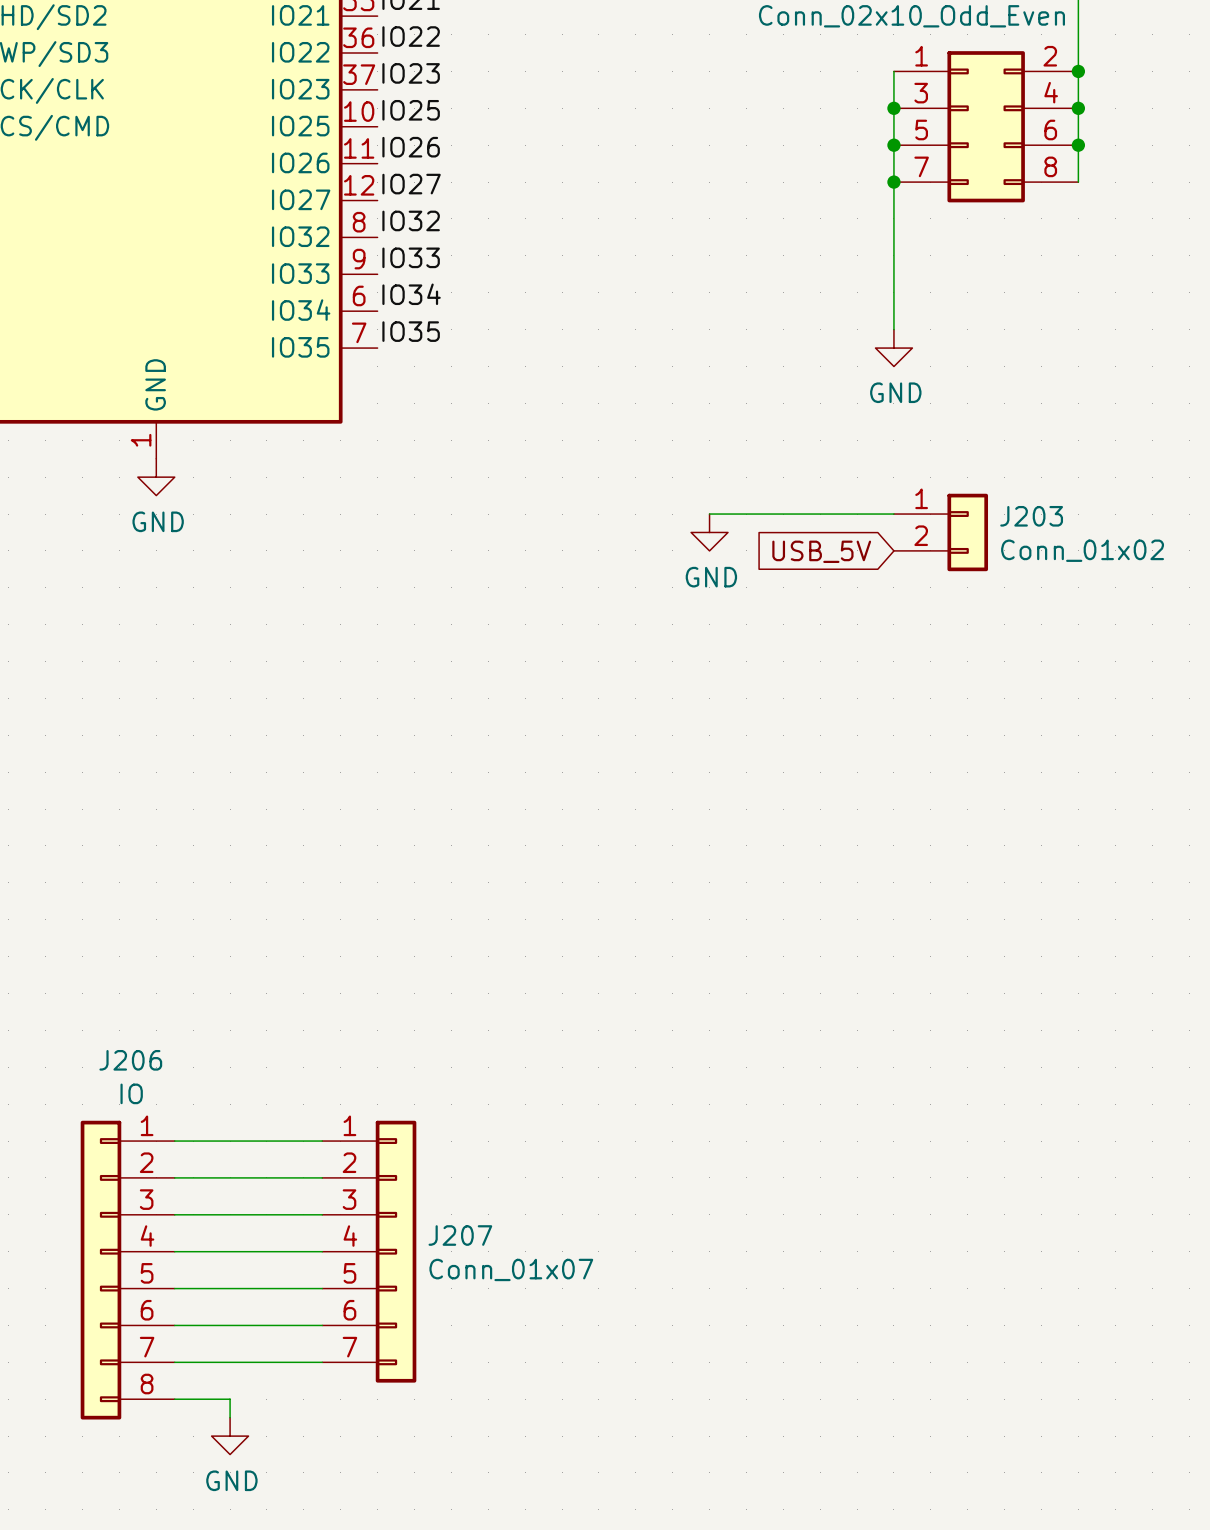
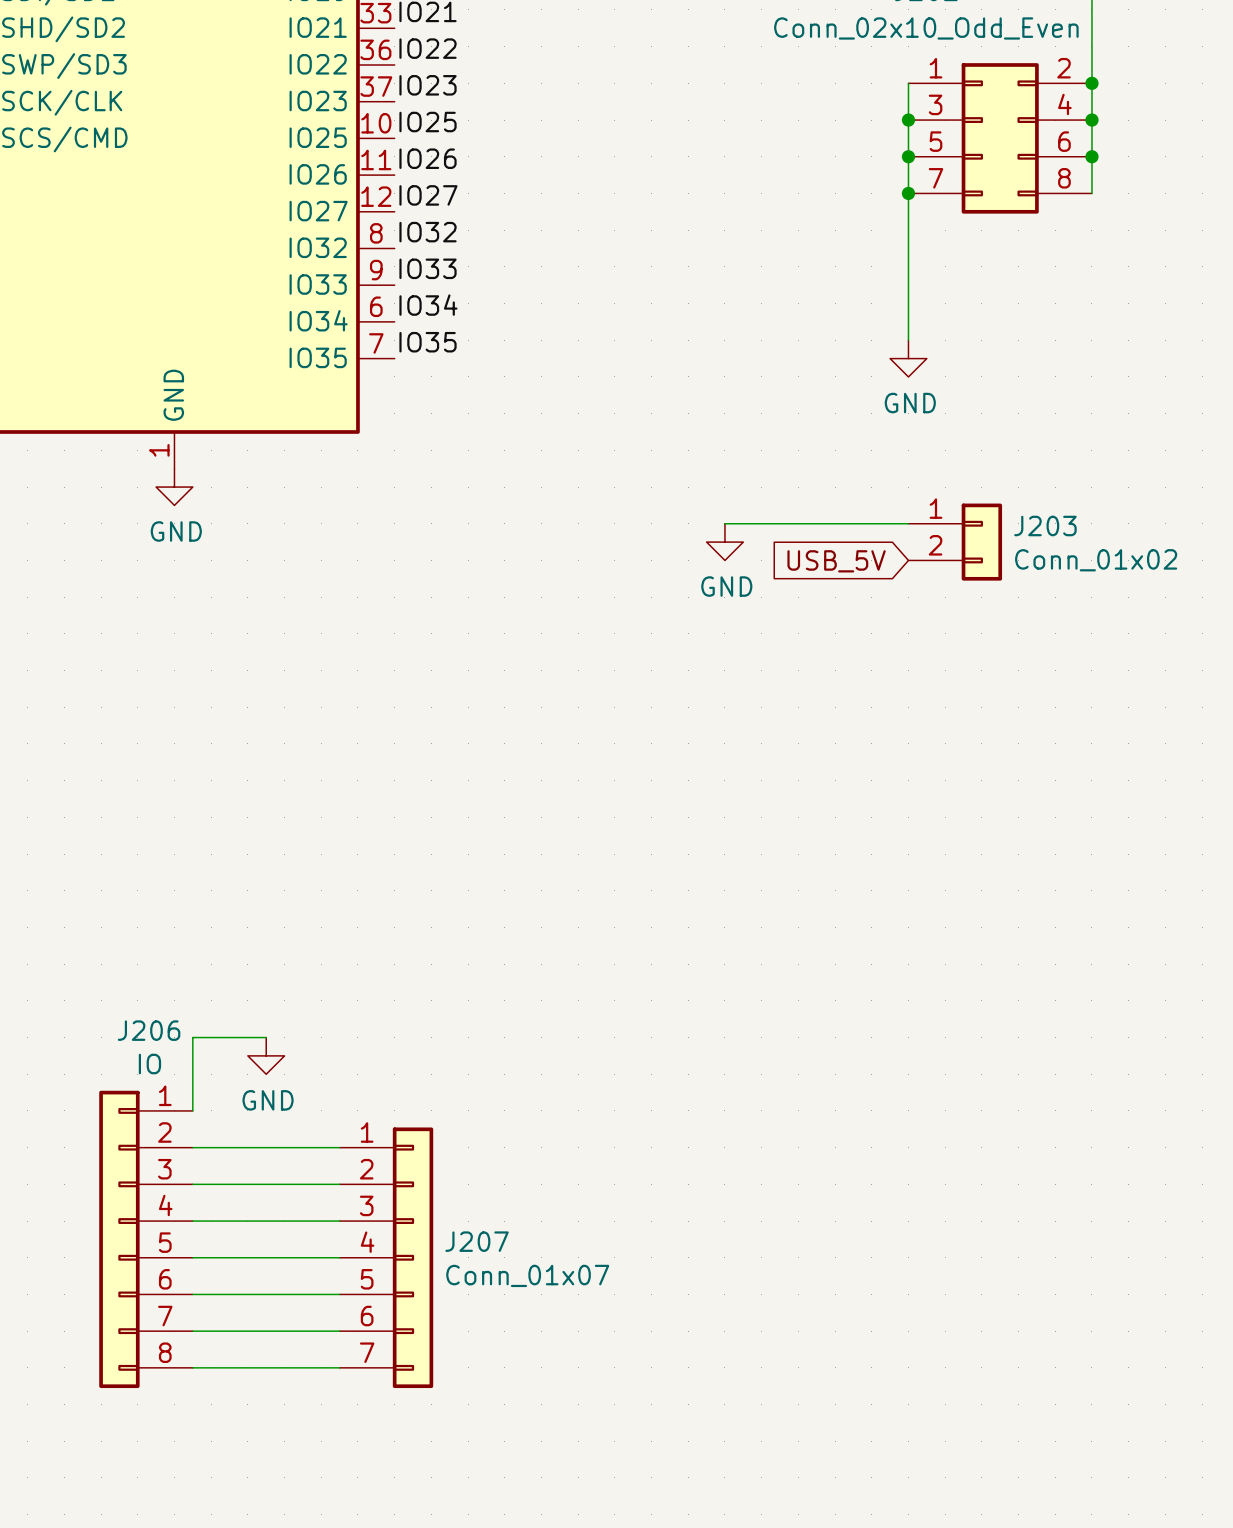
wire: none -> (266, 1037) (192, 1037) (192, 1110)
power symbol: none -> GND (266, 1055)
J206 position: (127, 1270) -> (146, 1239)
wire: (174, 1399) (230, 1399) (230, 1417) -> none
power symbol: GND (230, 1436) -> none

